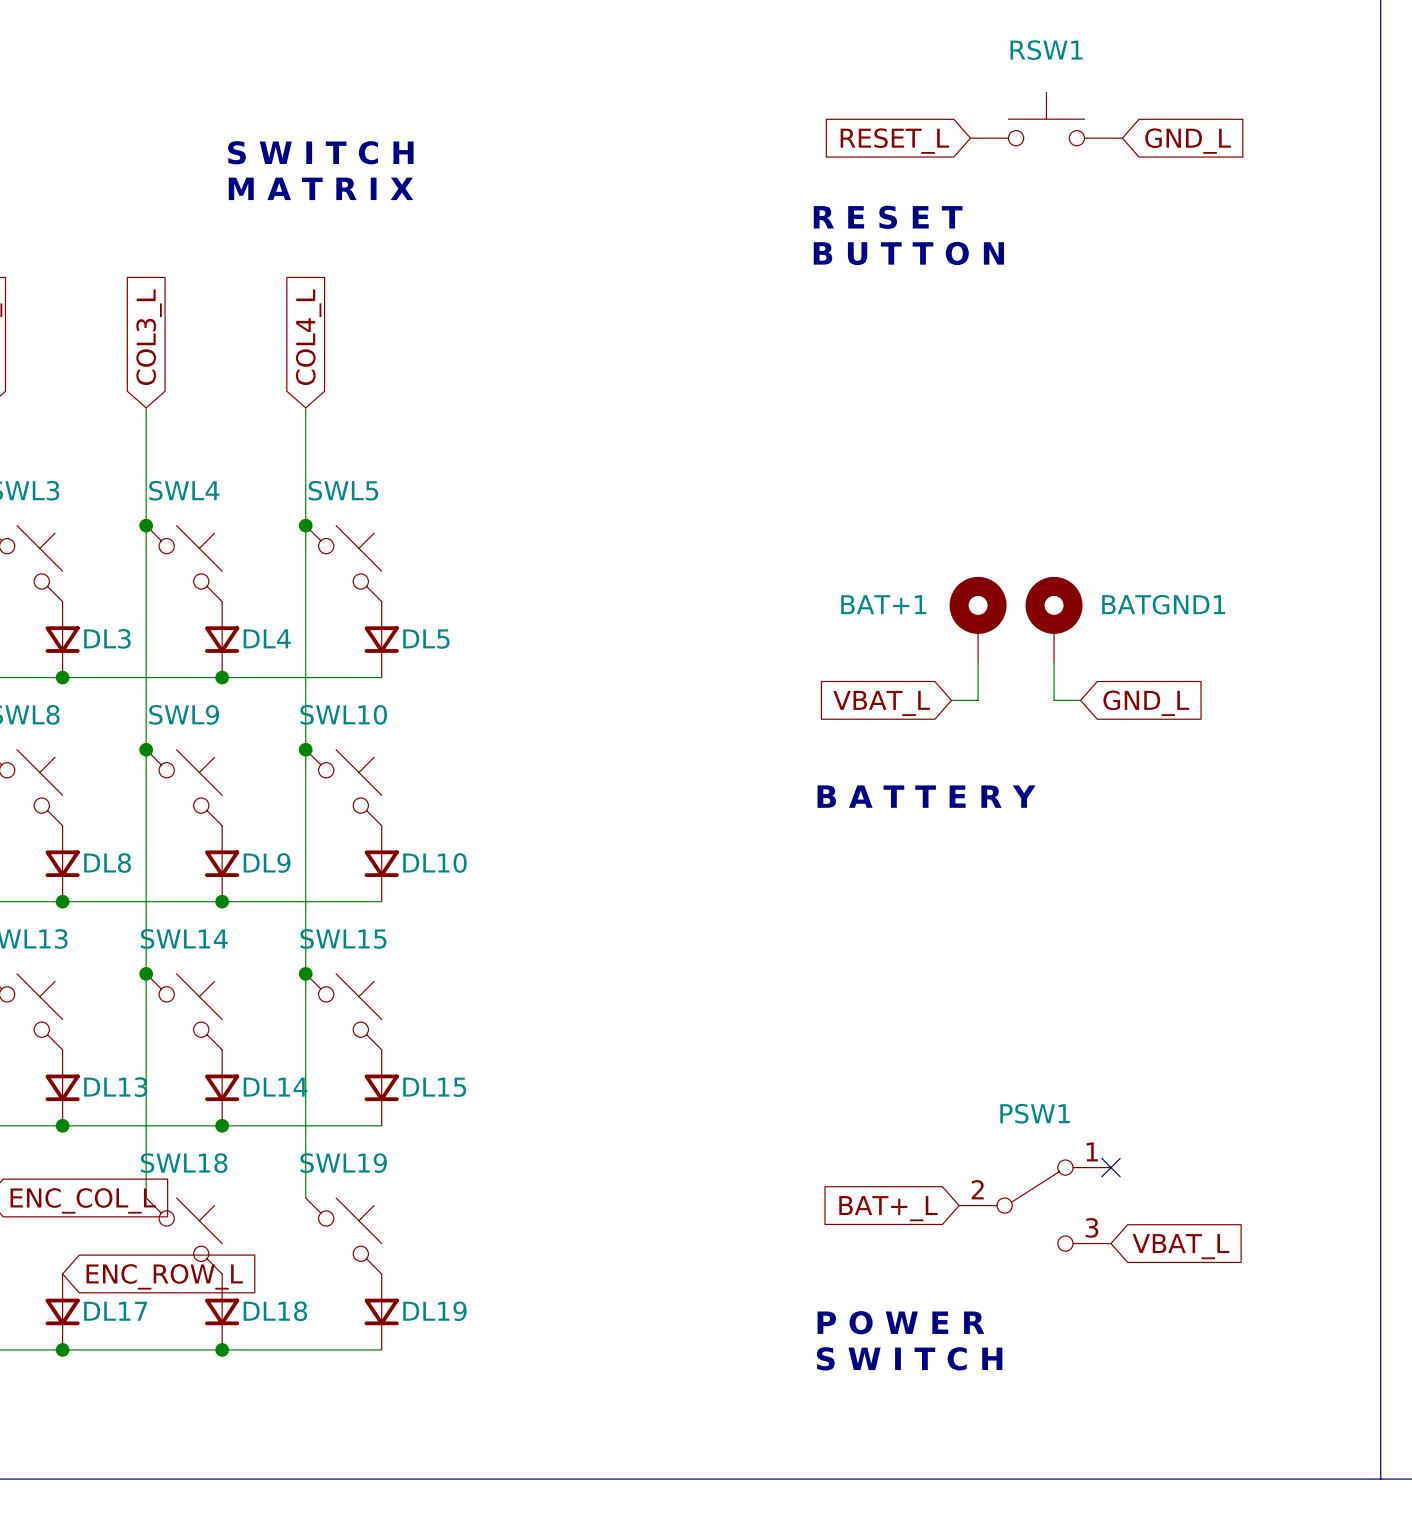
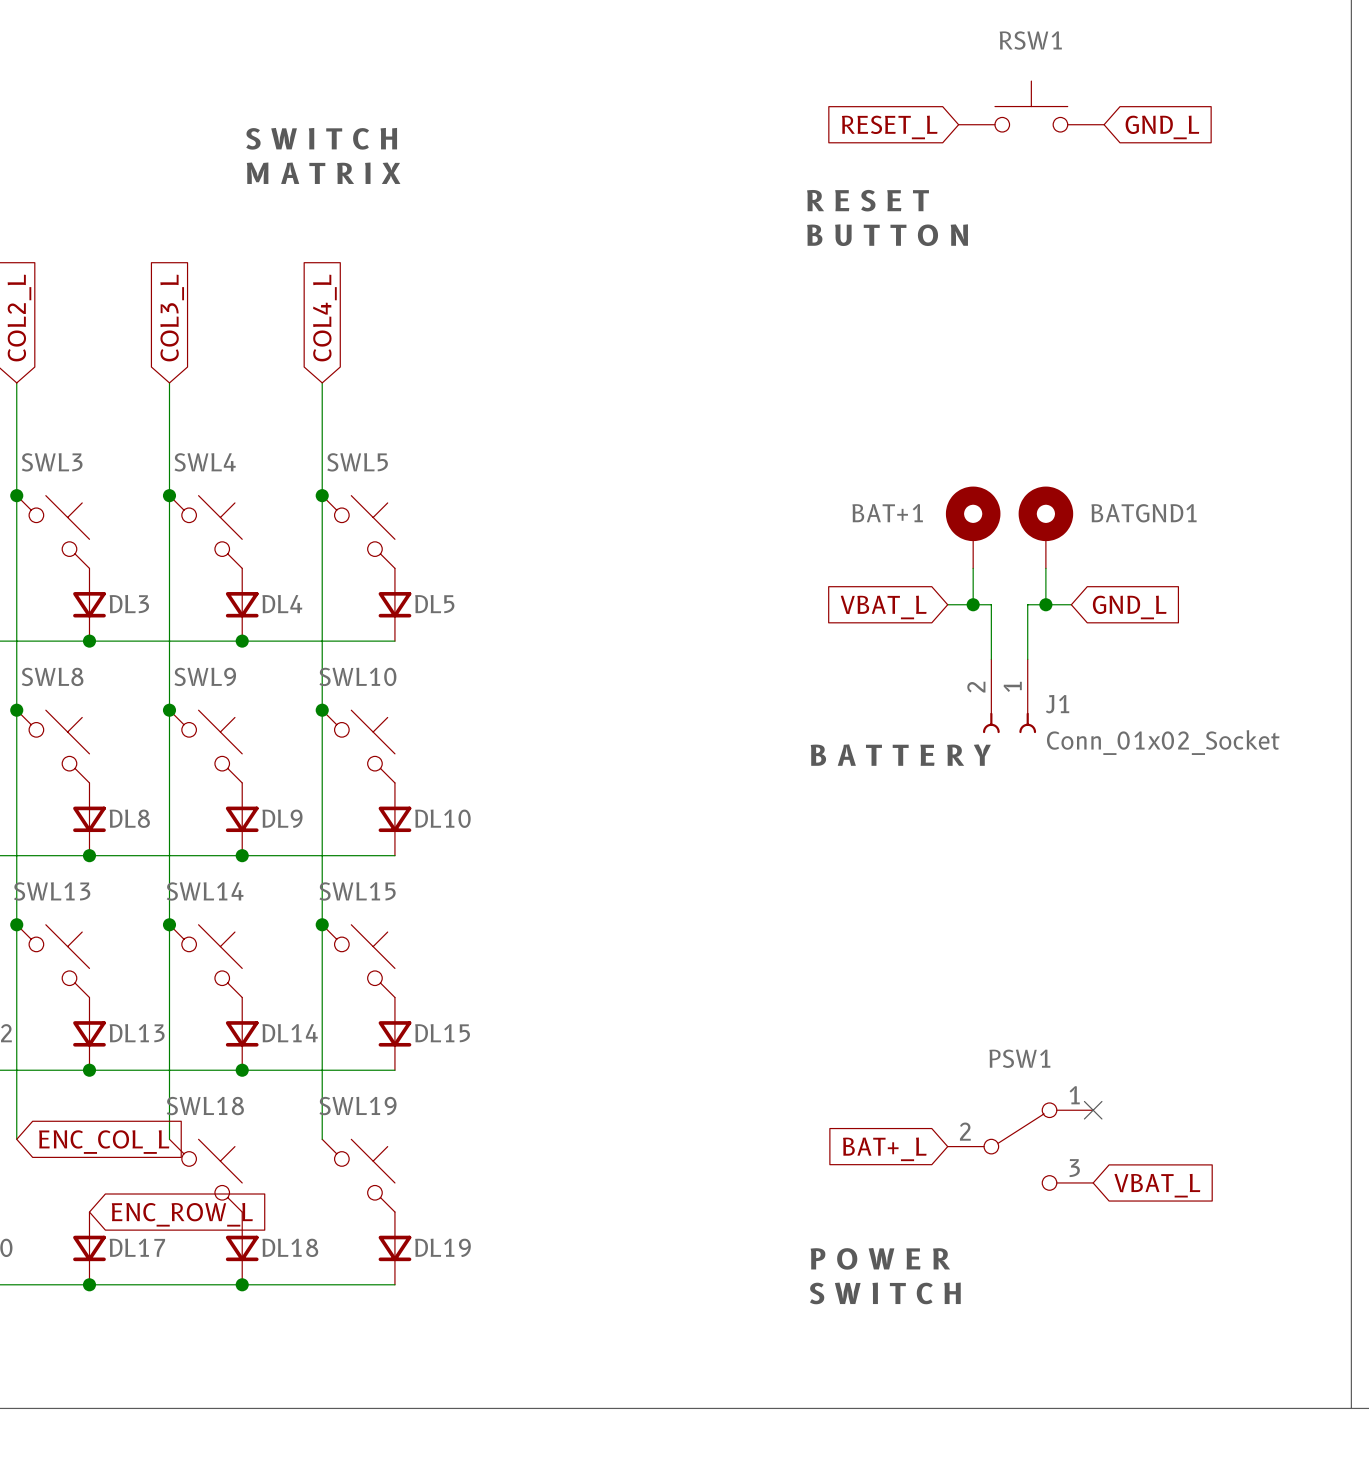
BAT+1 position: (978, 619) -> (973, 527)
BATGND1 position: (1054, 619) -> (1045, 527)
wire: none -> (947, 604) (991, 604) (991, 659)
junction: none -> (973, 604)
junction: none -> (1045, 604)
wire: none -> (1071, 604) (1027, 604) (1027, 659)
wire: (978, 662) (978, 700) (951, 700) -> none
wire: (1054, 662) (1054, 700) (1080, 700) -> none
global label position: VBAT_L (881, 703) -> VBAT_L (883, 607)
global label position: GND_L (1146, 703) -> GND_L (1129, 607)
J1: none -> Conn_01x02_Socket (1009, 696)

